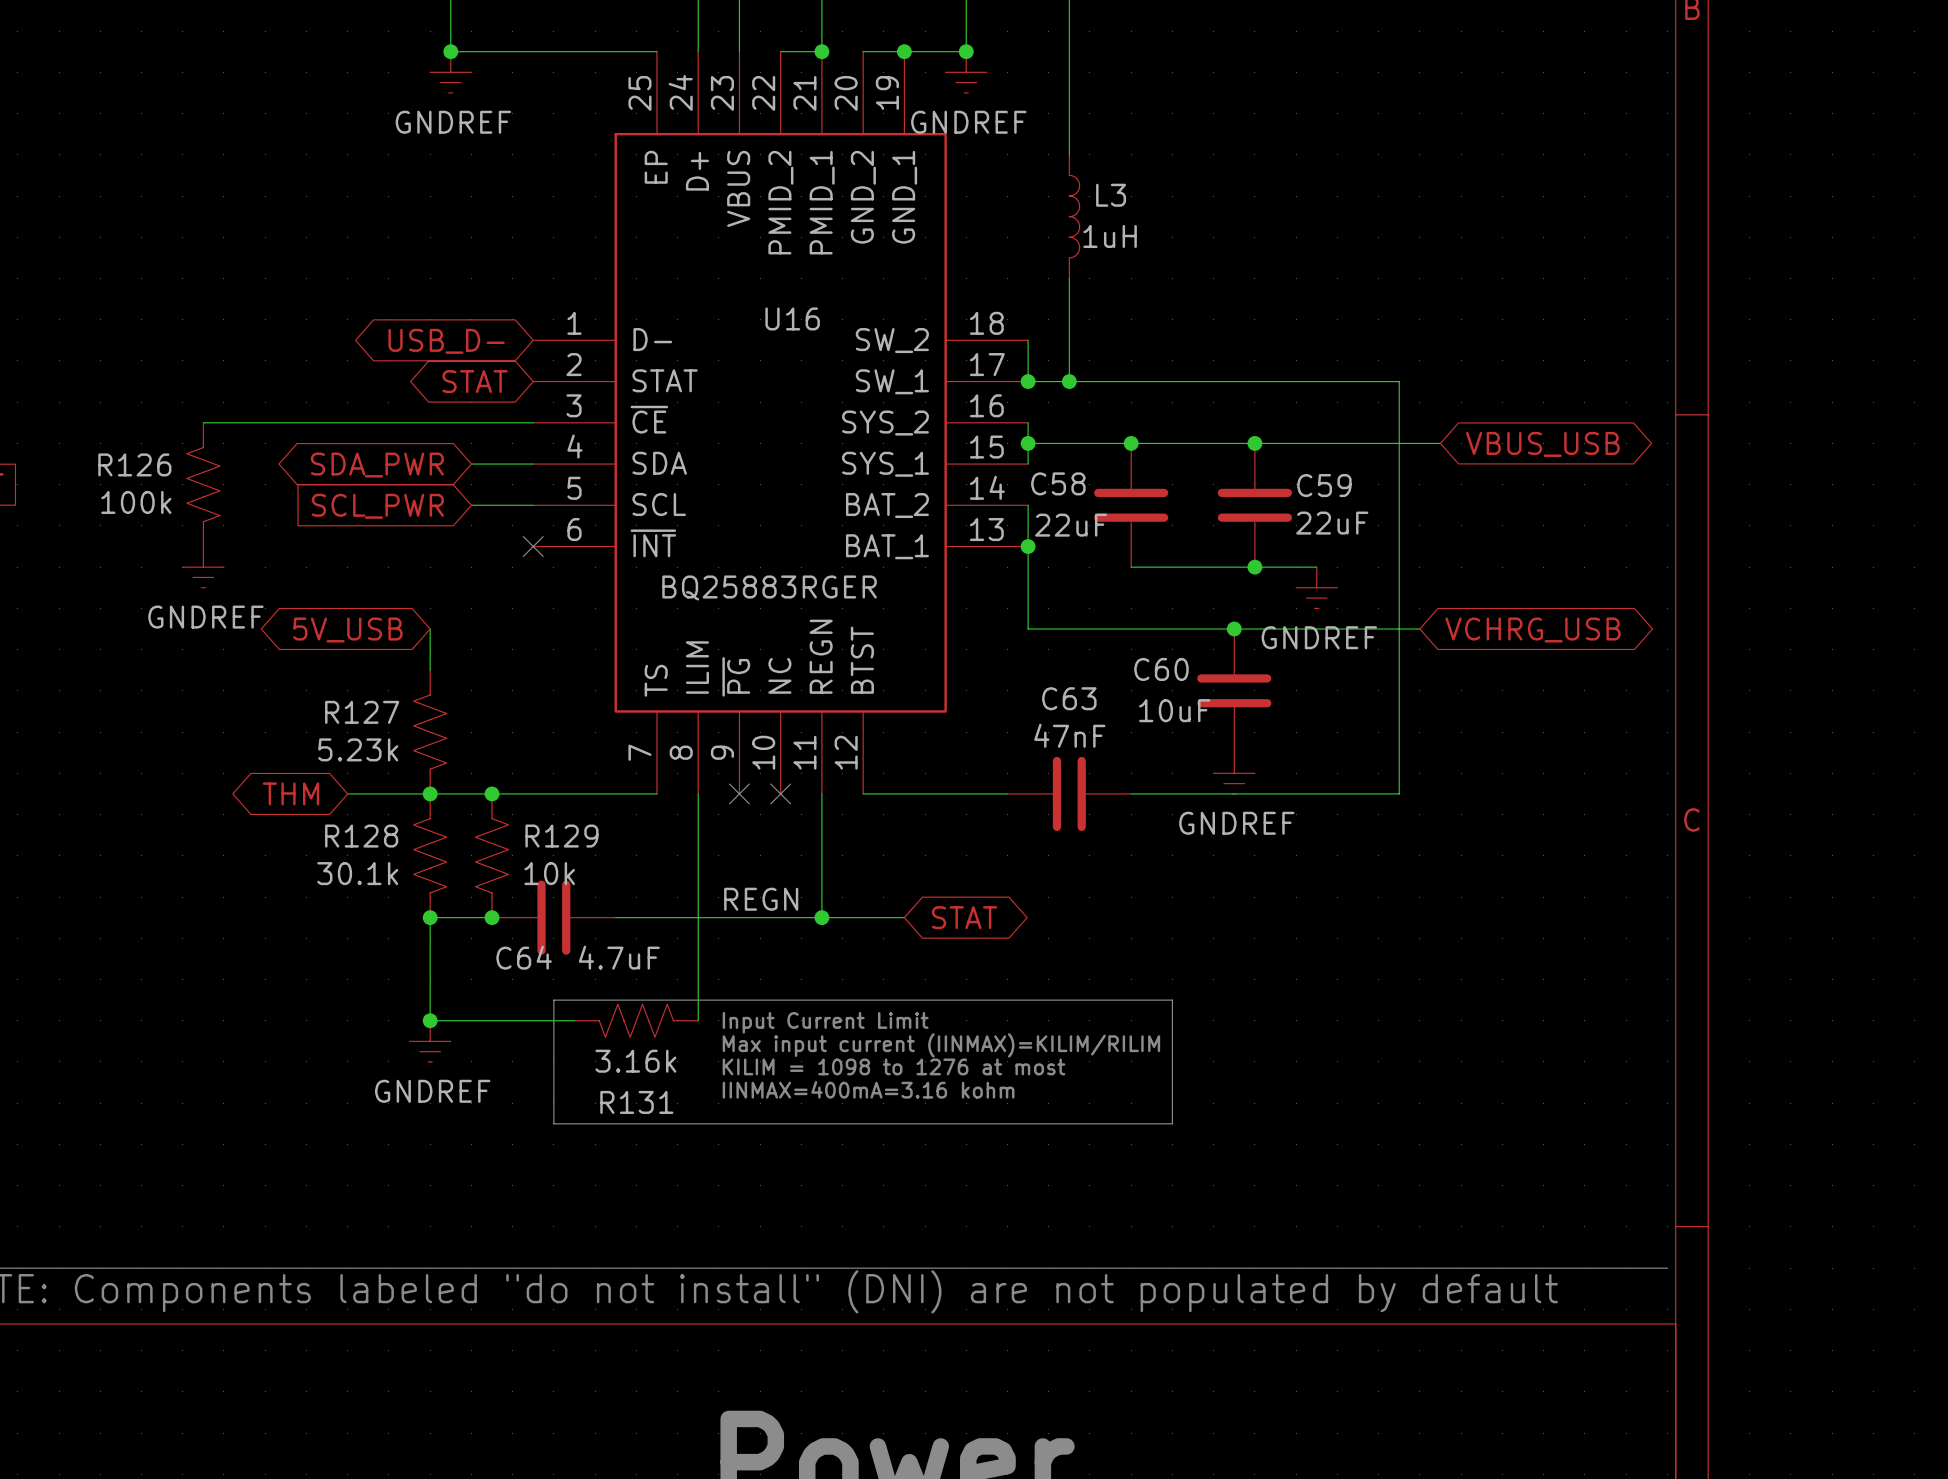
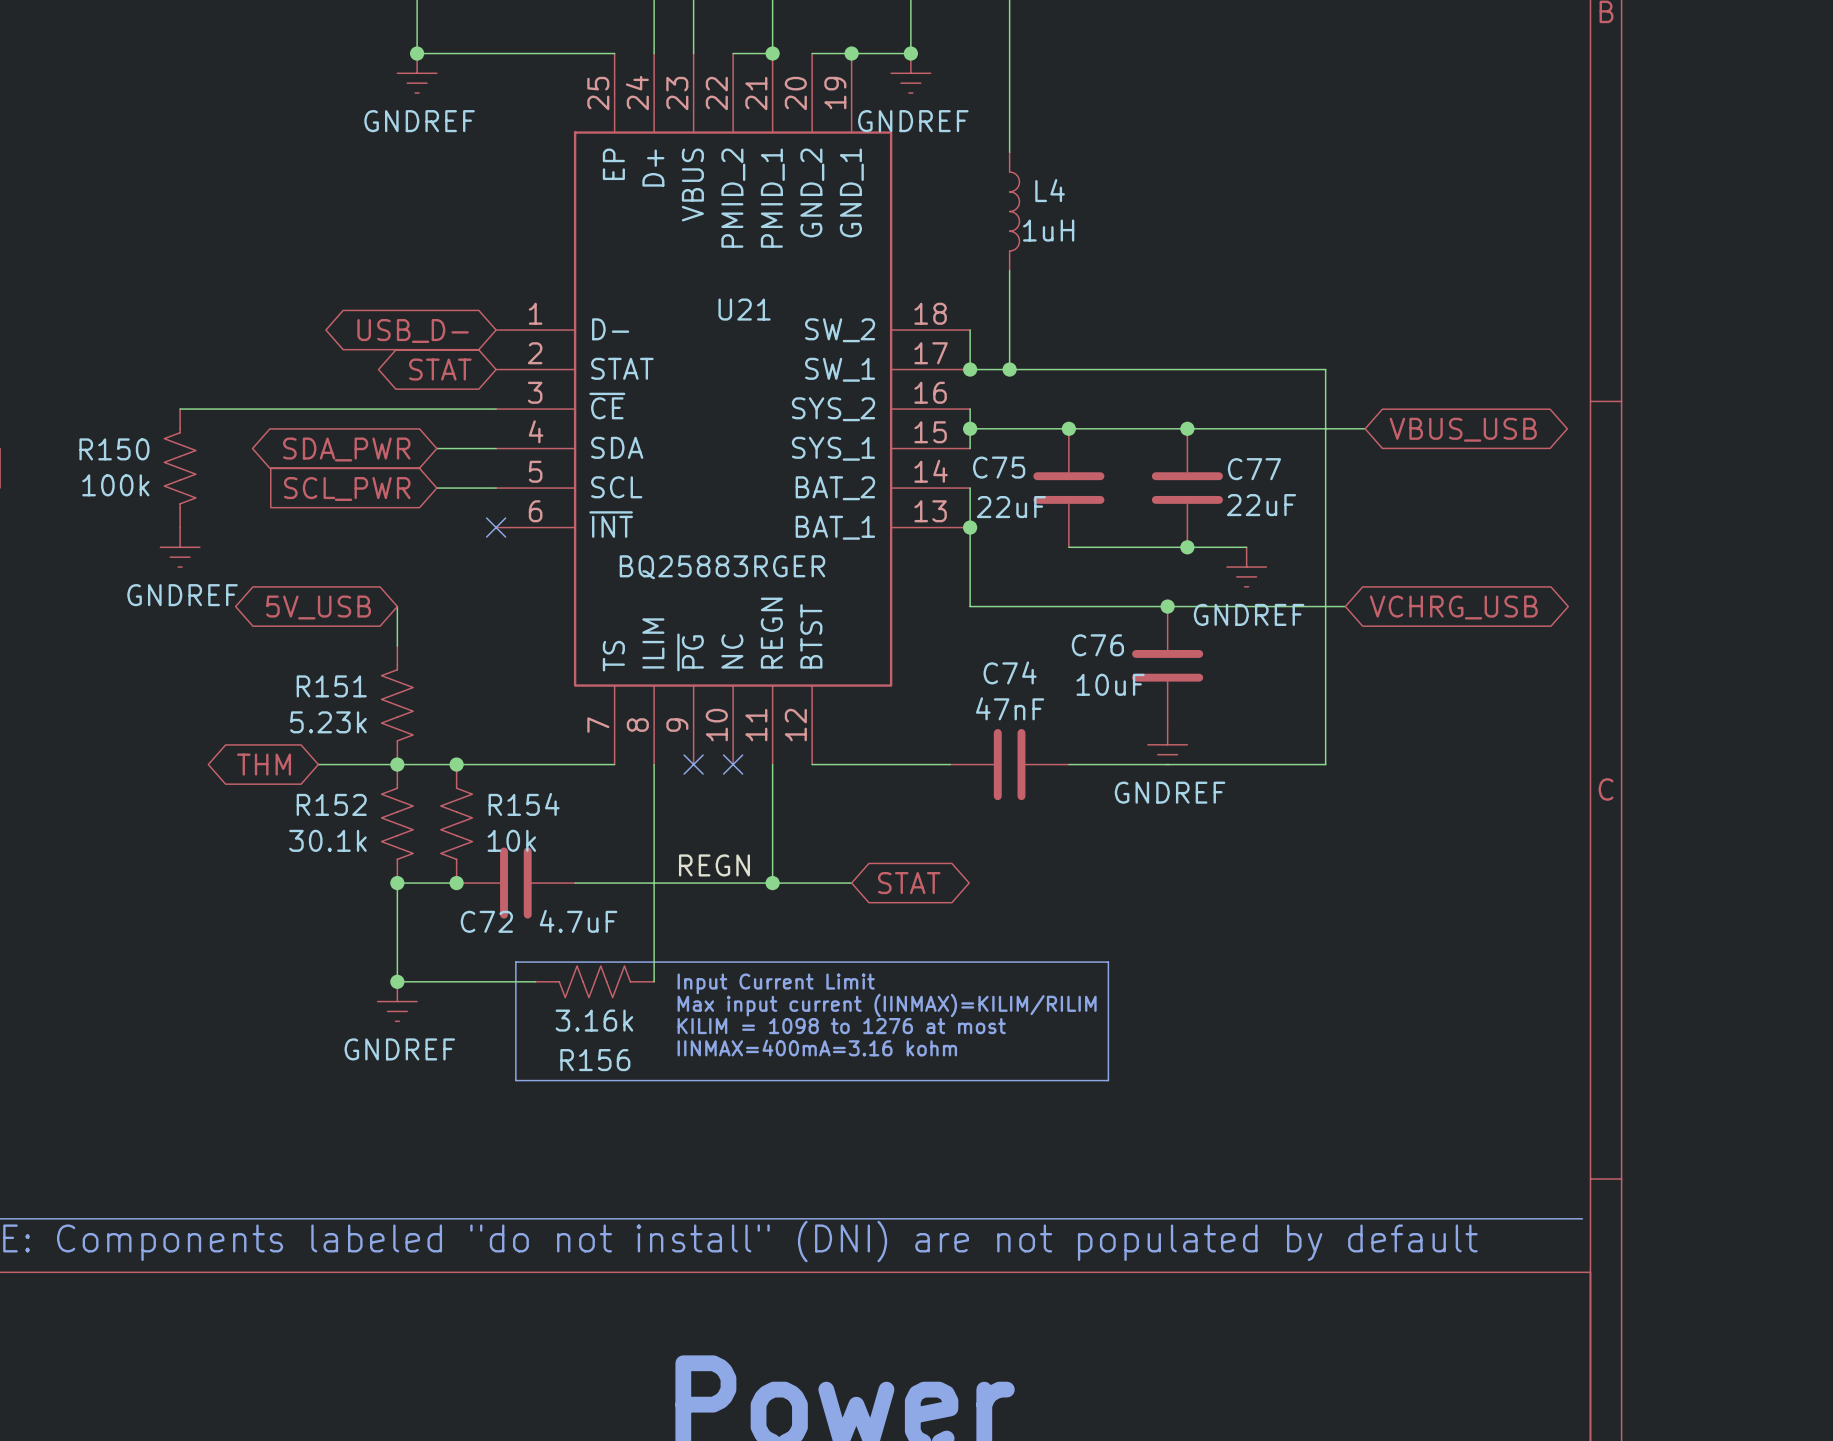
L3 name: L3 (1111, 195) -> L4 (1050, 190)
U16 name: U16 (792, 318) -> U21 (744, 309)
R126 name: R126 (134, 464) -> R150 (114, 449)
C58 name: C58 (1058, 483) -> C75 (999, 467)
C59 name: C59 (1324, 485) -> C77 (1254, 469)
C60 name: C60 (1161, 669) -> C76 (1097, 645)
C63 name: C63 (1069, 698) -> C74 (1010, 672)
R127 name: R127 (362, 712) -> R151 (331, 686)
R128 name: R128 (361, 836) -> R152 (331, 804)
R129 name: R129 (561, 836) -> R154 (524, 804)
C64 name: C64 (524, 957) -> C72 (486, 921)
R131 name: R131 (636, 1102) -> R156 (595, 1060)

